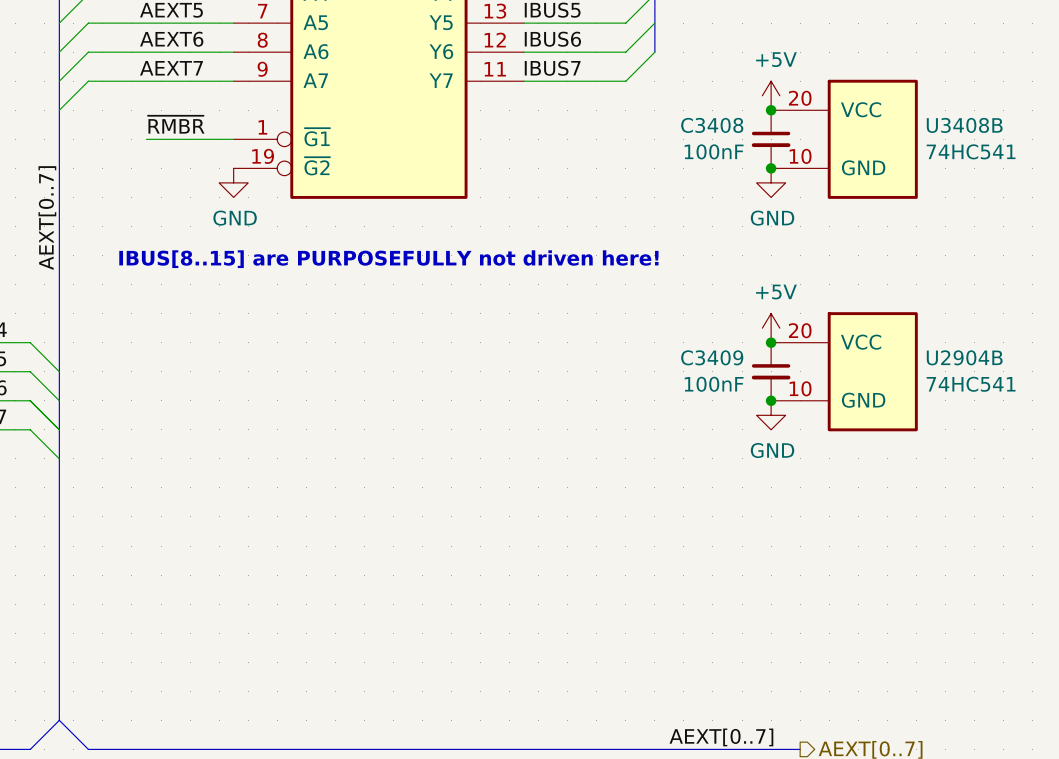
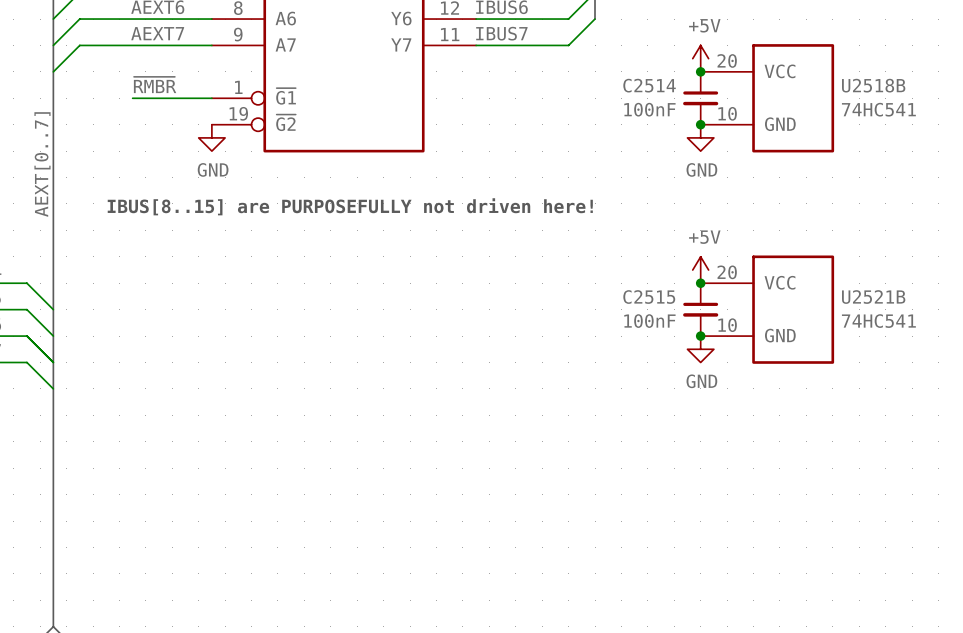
C3408 name: C3408 (712, 125) -> C2514 (649, 85)
U3408B name: U3408B (964, 125) -> U2518B (873, 85)
C3409 name: C3409 (712, 357) -> C2515 (649, 297)
U2904B name: U2904B (964, 357) -> U2521B (873, 297)

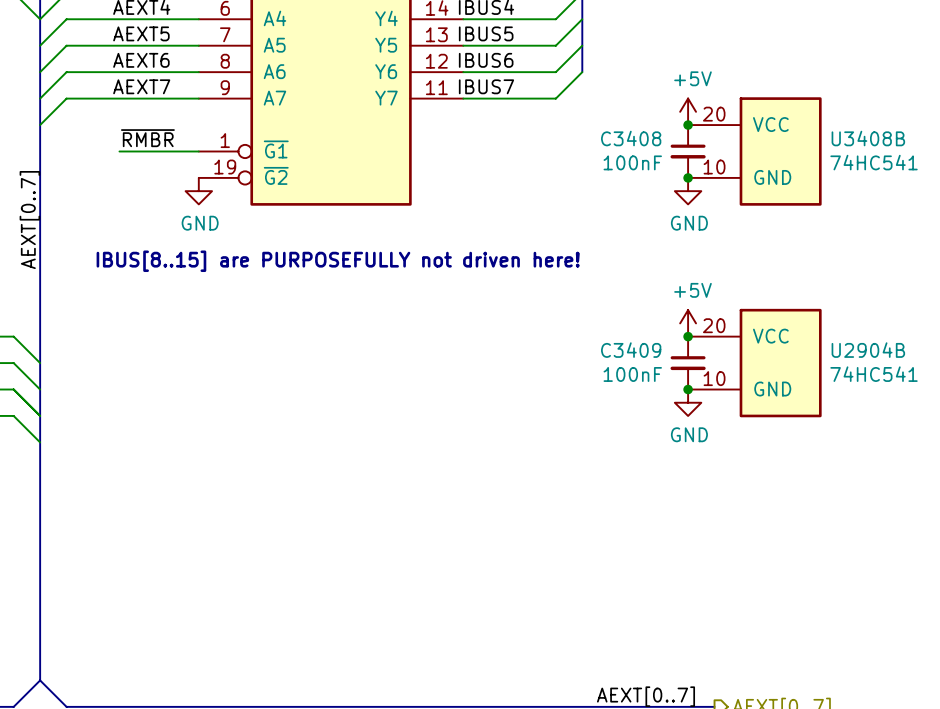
C2514 name: C2514 (649, 85) -> C3408 (631, 138)
U2518B name: U2518B (873, 85) -> U3408B (868, 138)
C2515 name: C2515 (649, 297) -> C3409 (631, 350)
U2521B name: U2521B (873, 297) -> U2904B (868, 350)

